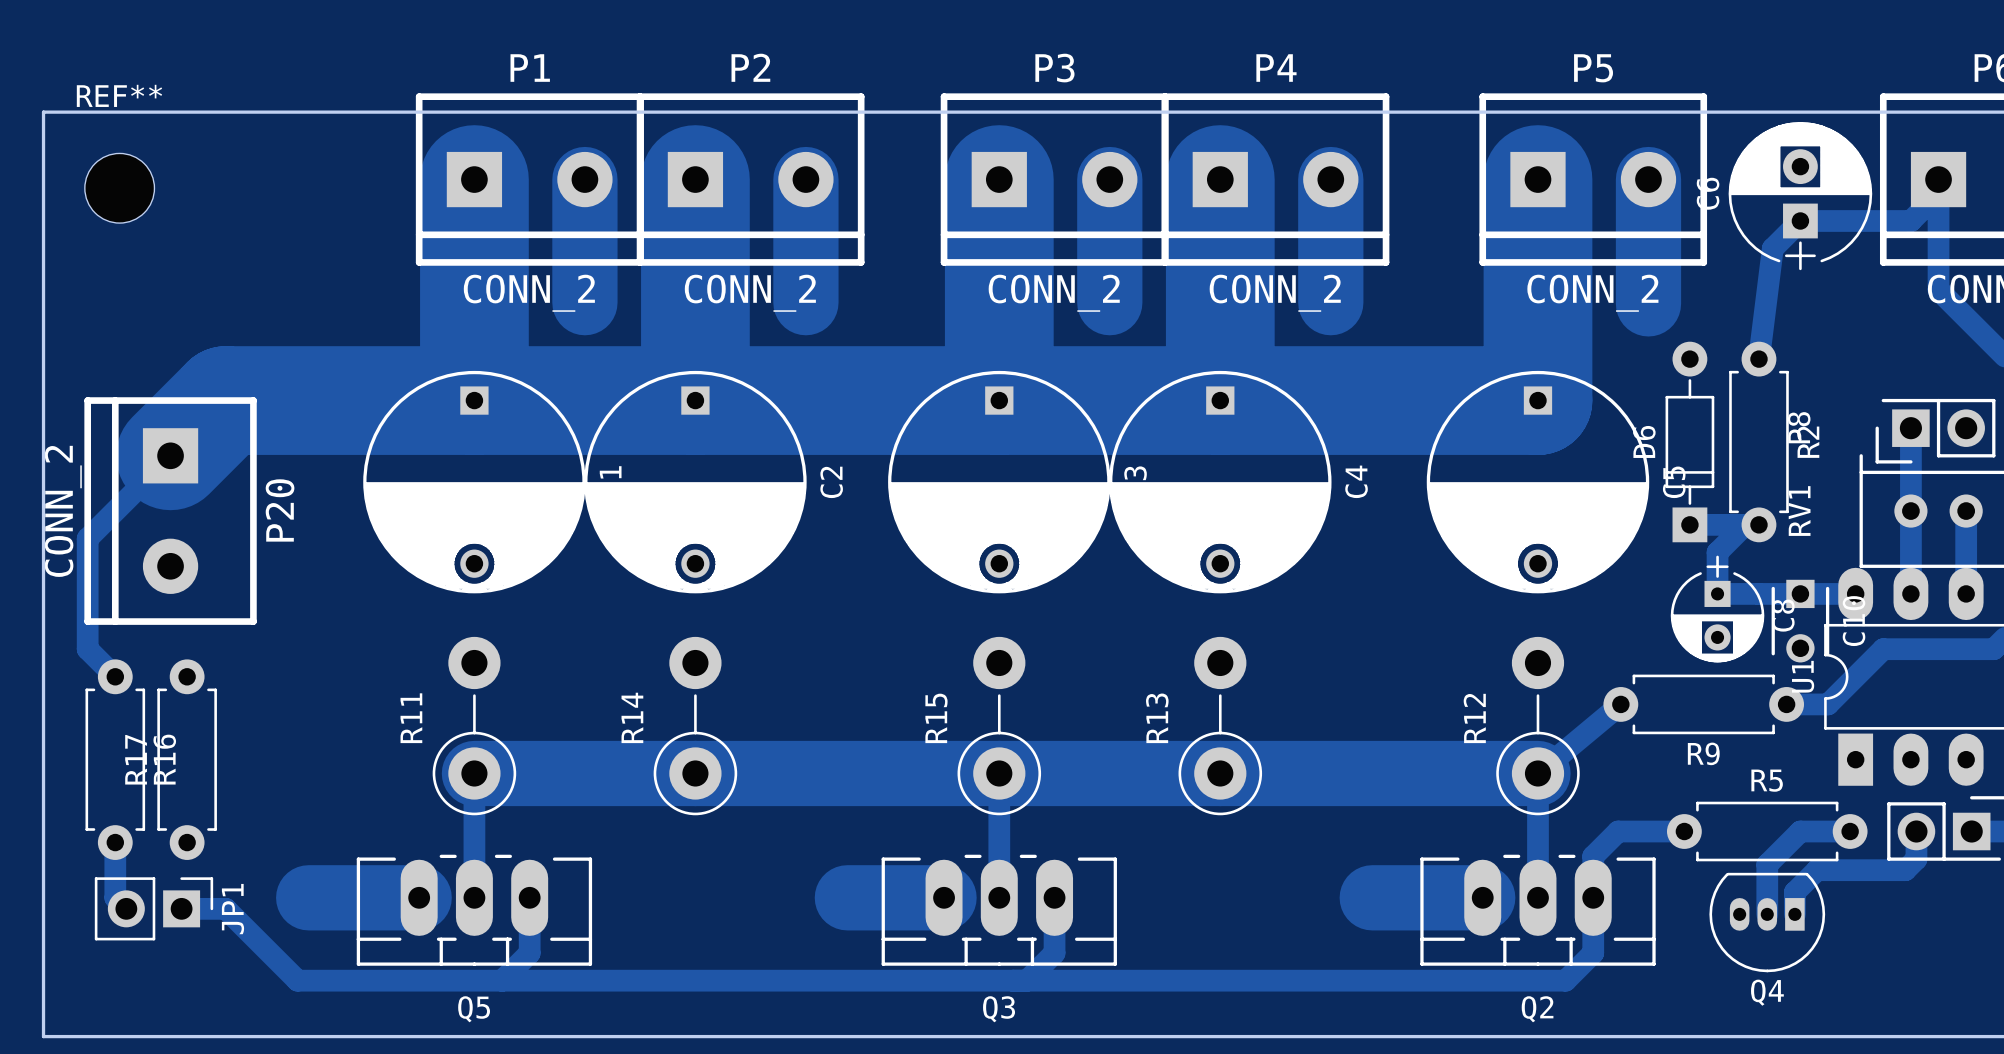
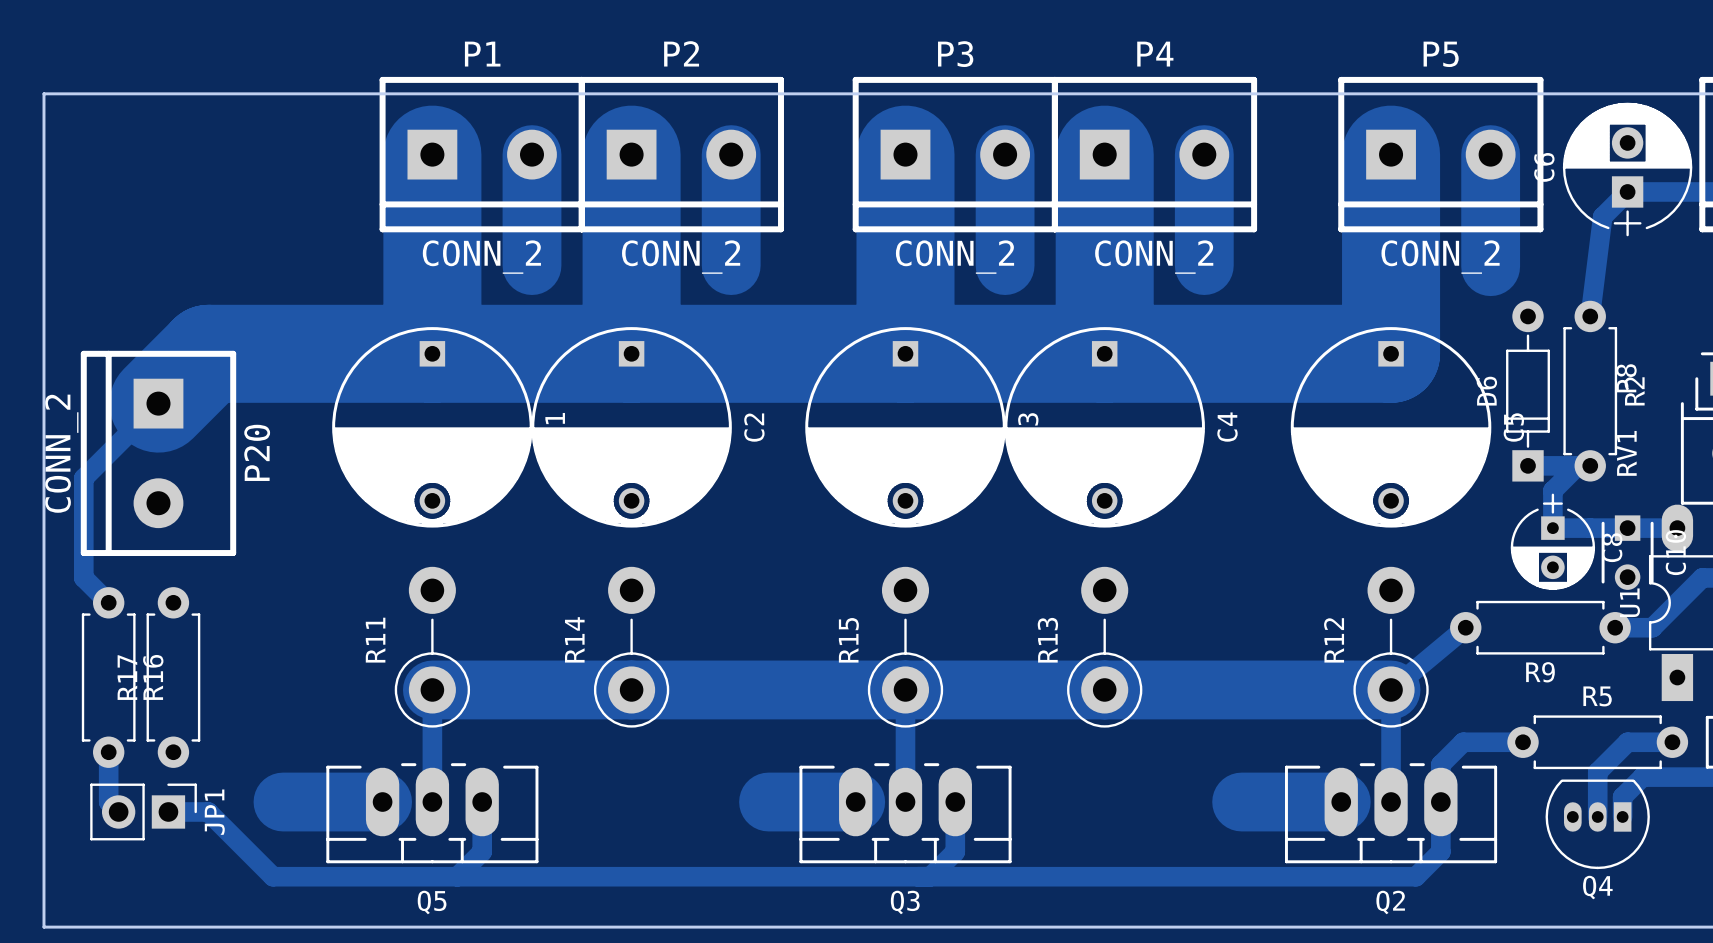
REF**: (119, 188) -> none

